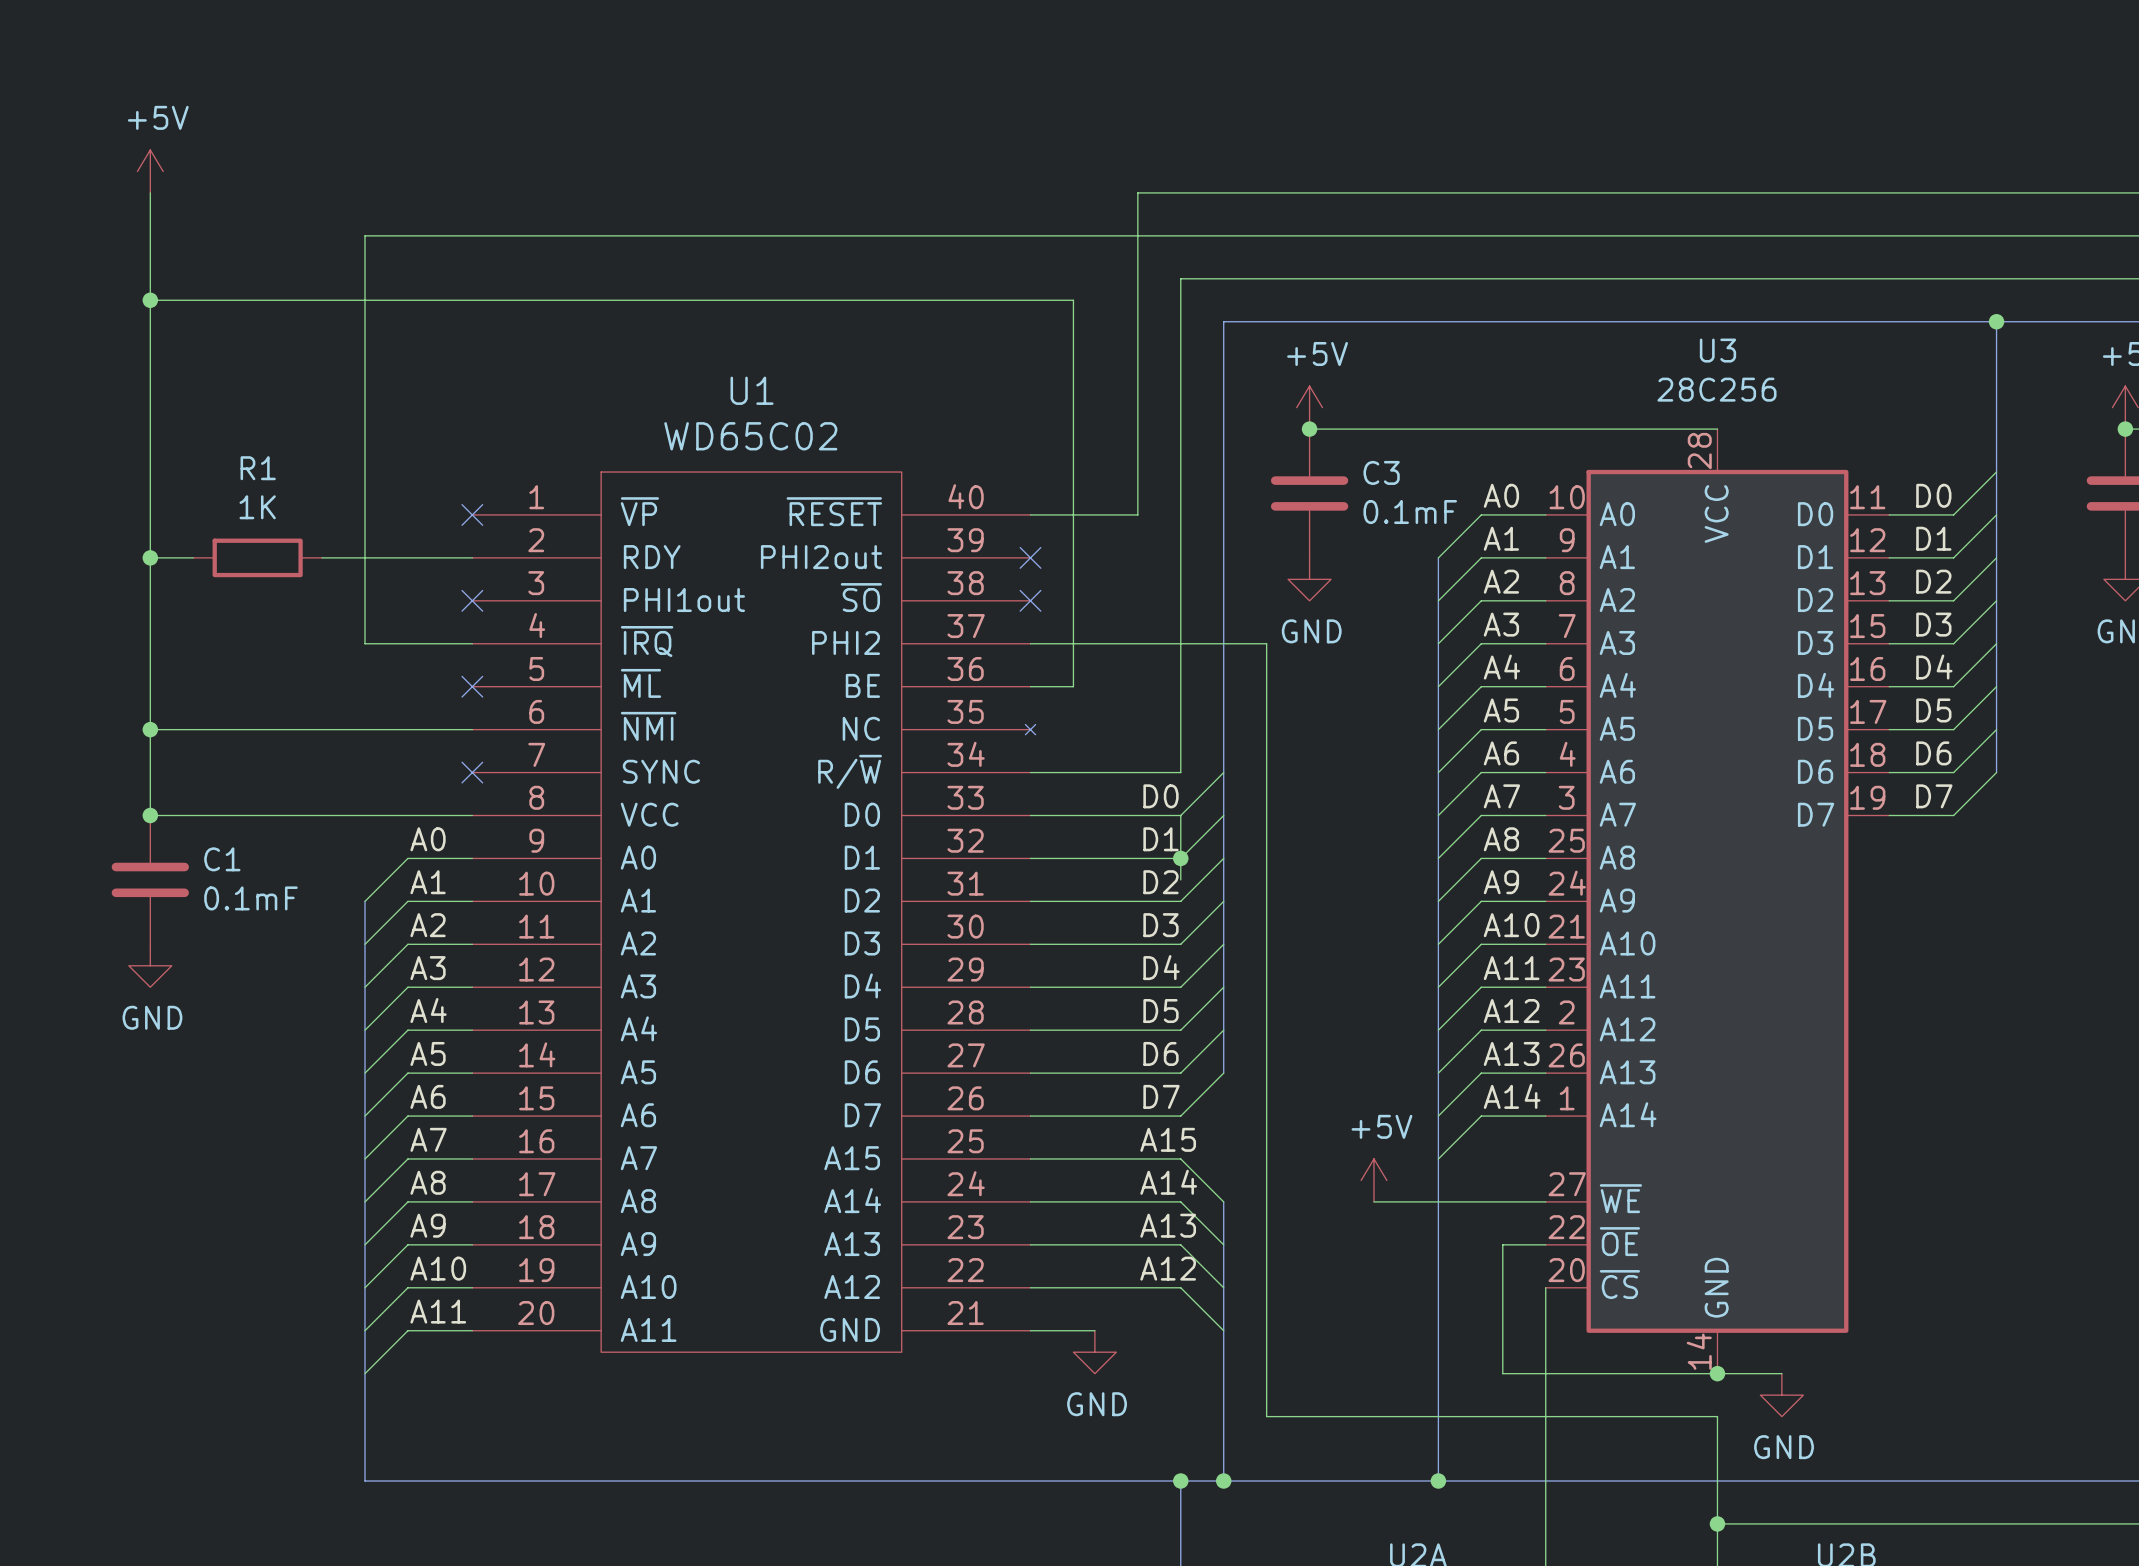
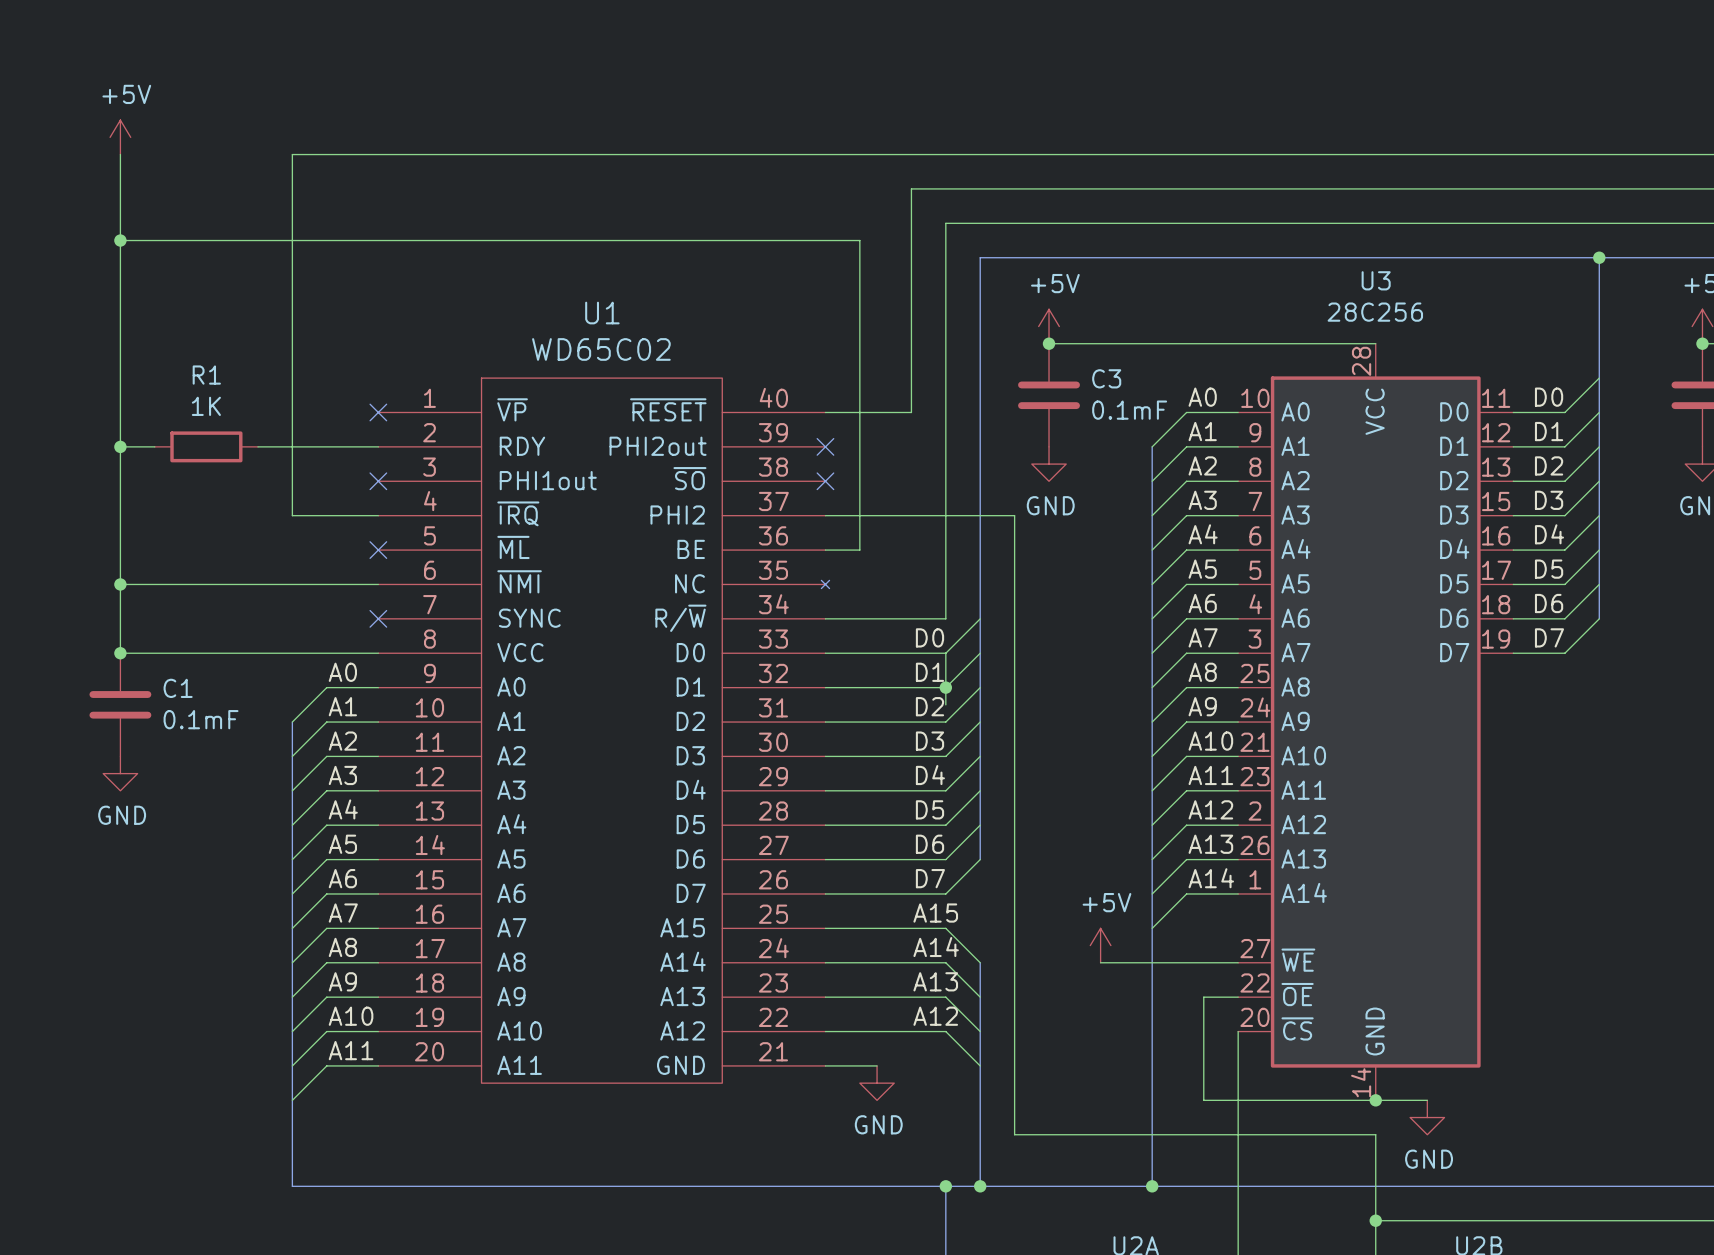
wire: (1137, 192) (1137, 235) (364, 235) -> (911, 154) (292, 154) (292, 188)

